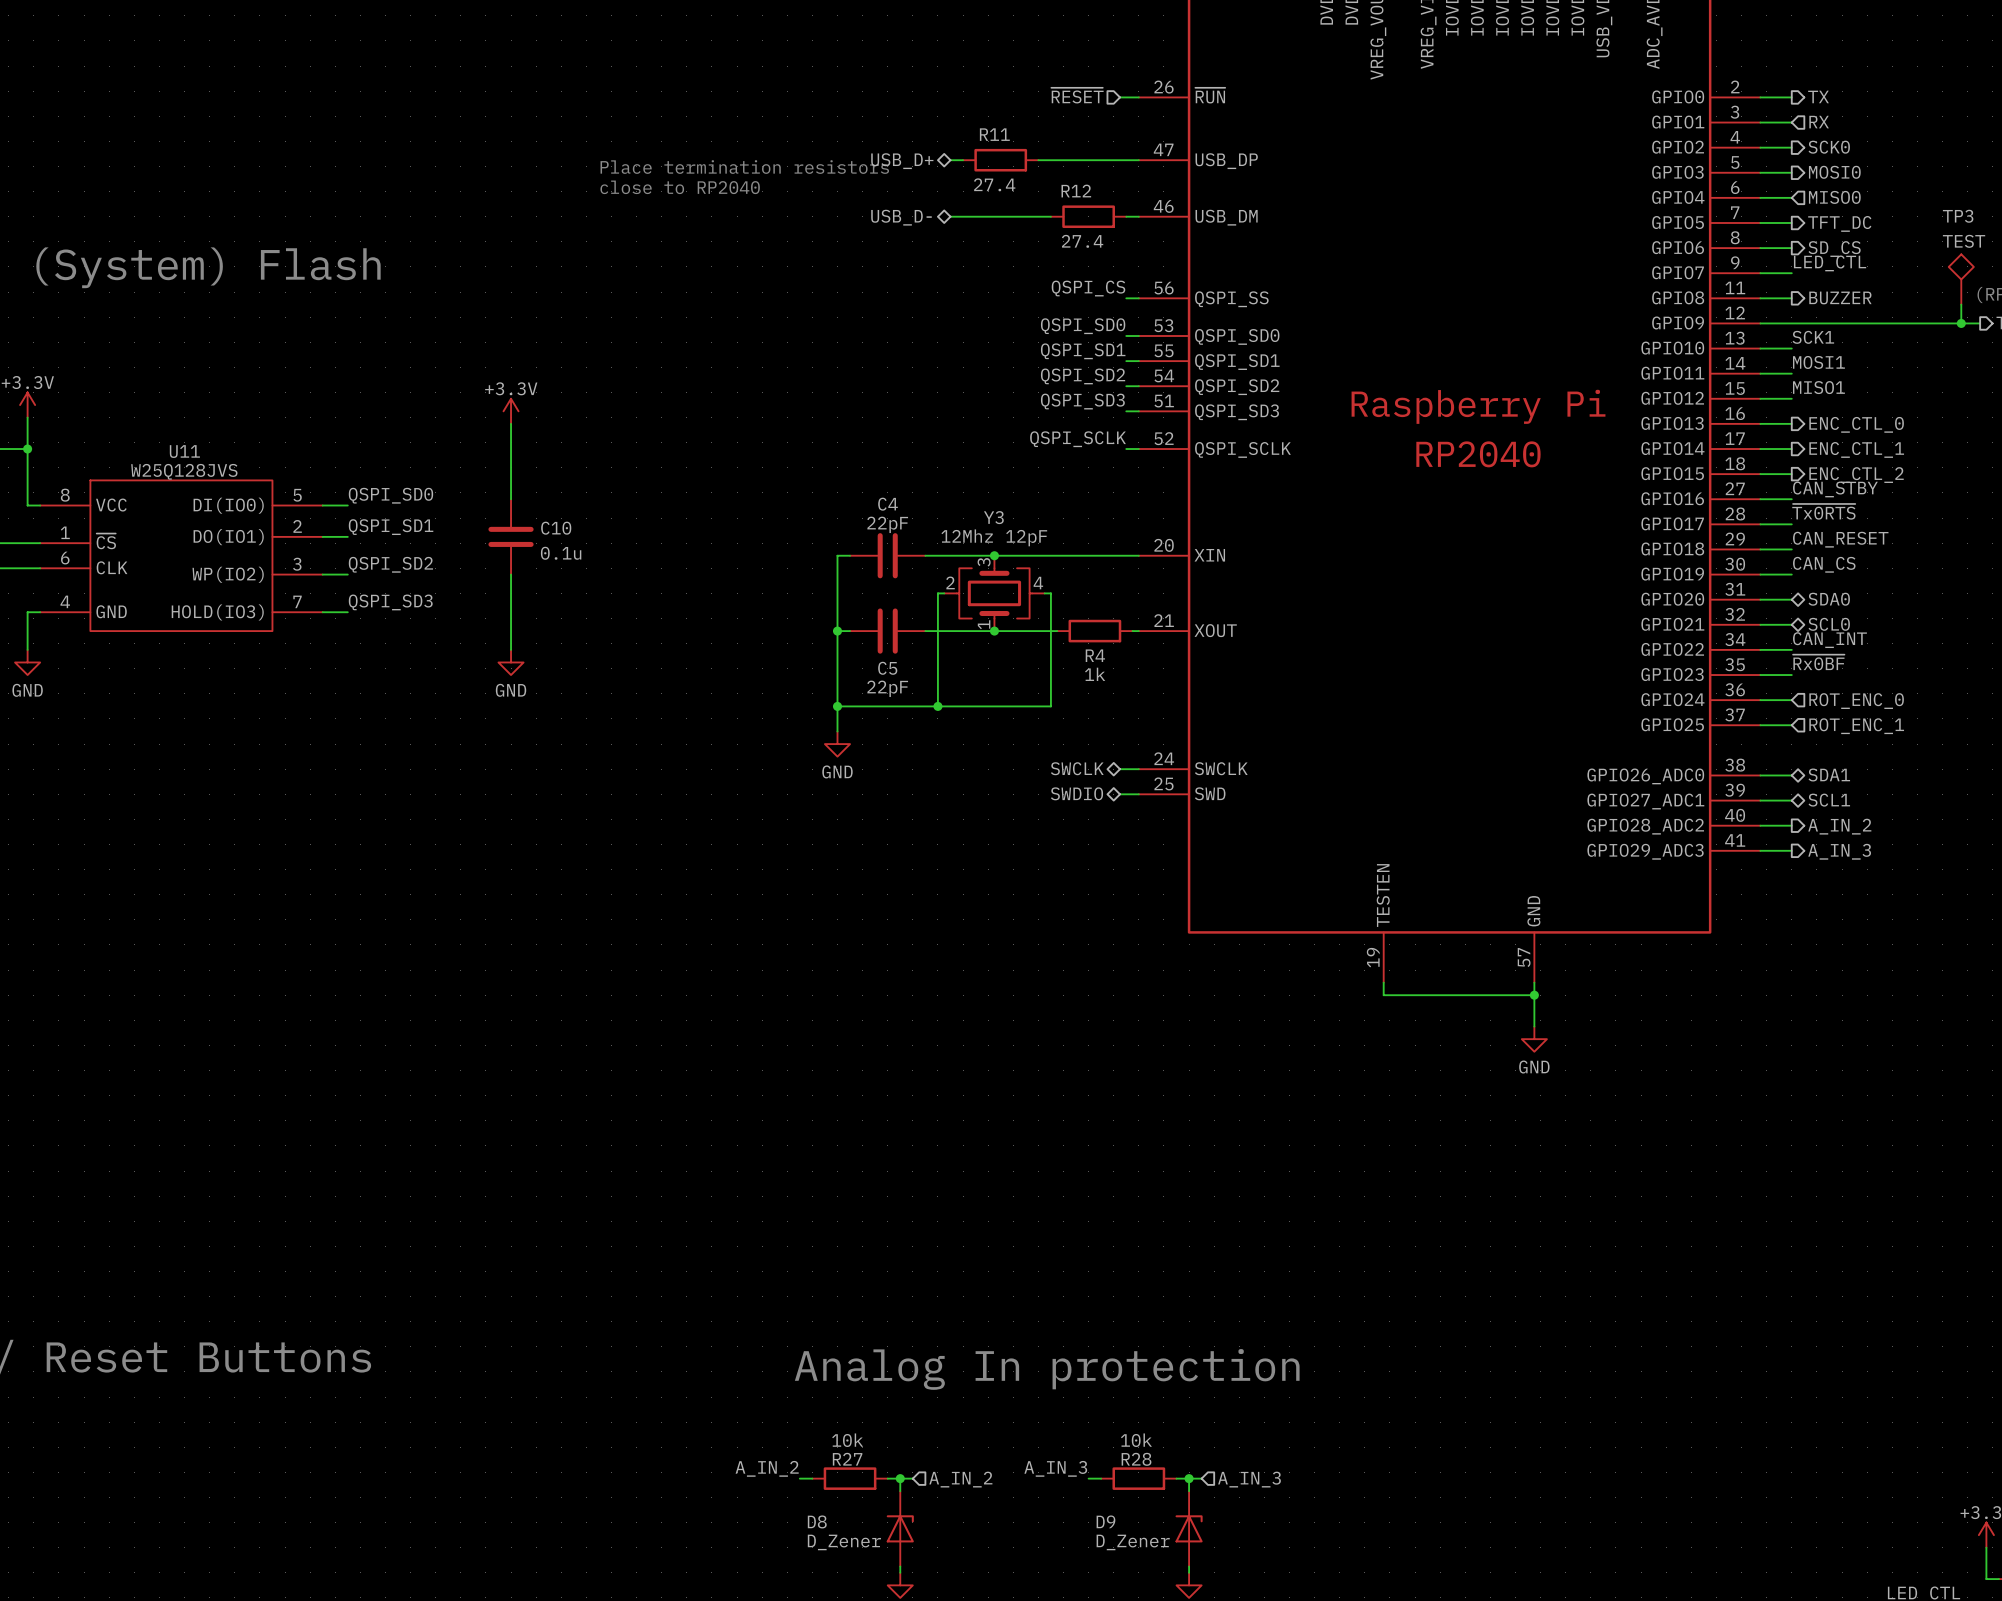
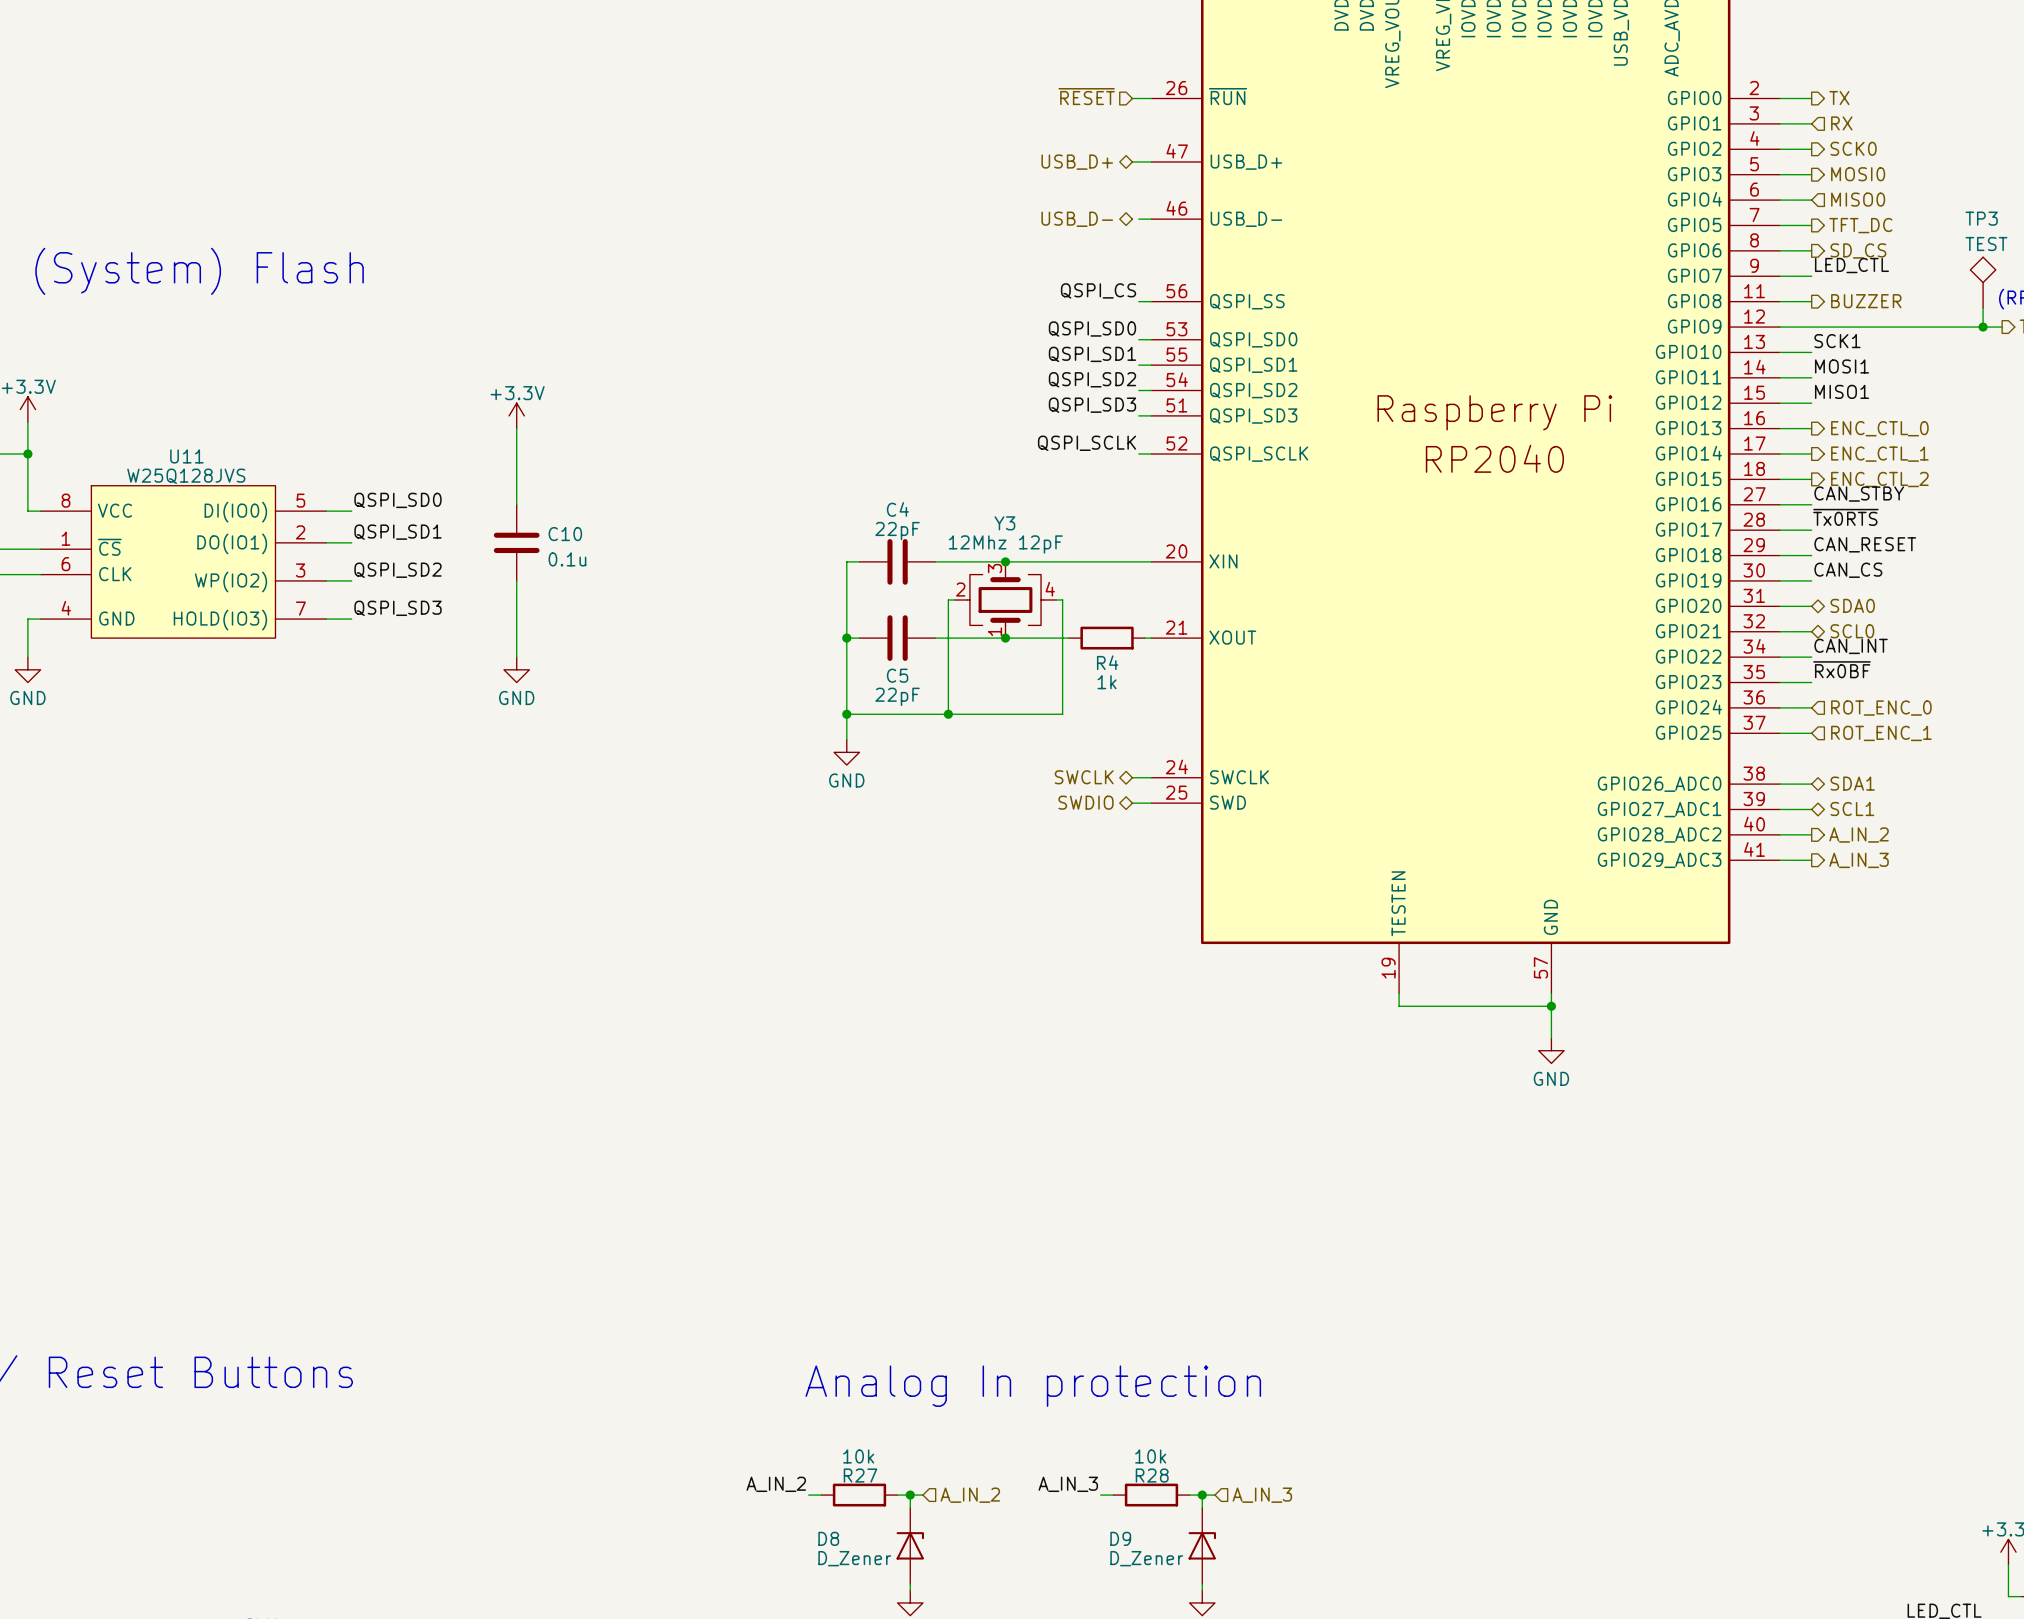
wire: (950, 160) (963, 160) -> none
R11: 27.4 (1000, 160) -> none
wire: (1038, 160) (1120, 160) -> none
hierarchical label position: USB_D+ (902, 161) -> USB_D+ (1077, 162)
part pin name: USB_DP (1226, 161) -> USB_D+ (1246, 162)
text: Place termination resistors (744, 167) -> none
text: close to RP2040 (680, 187) -> none
wire: (950, 216) (1050, 216) -> none
R12: 27.4 (1088, 216) -> none
hierarchical label position: USB_D- (901, 217) -> USB_D- (1077, 219)
part pin name: USB_DM (1226, 217) -> USB_D- (1246, 219)

